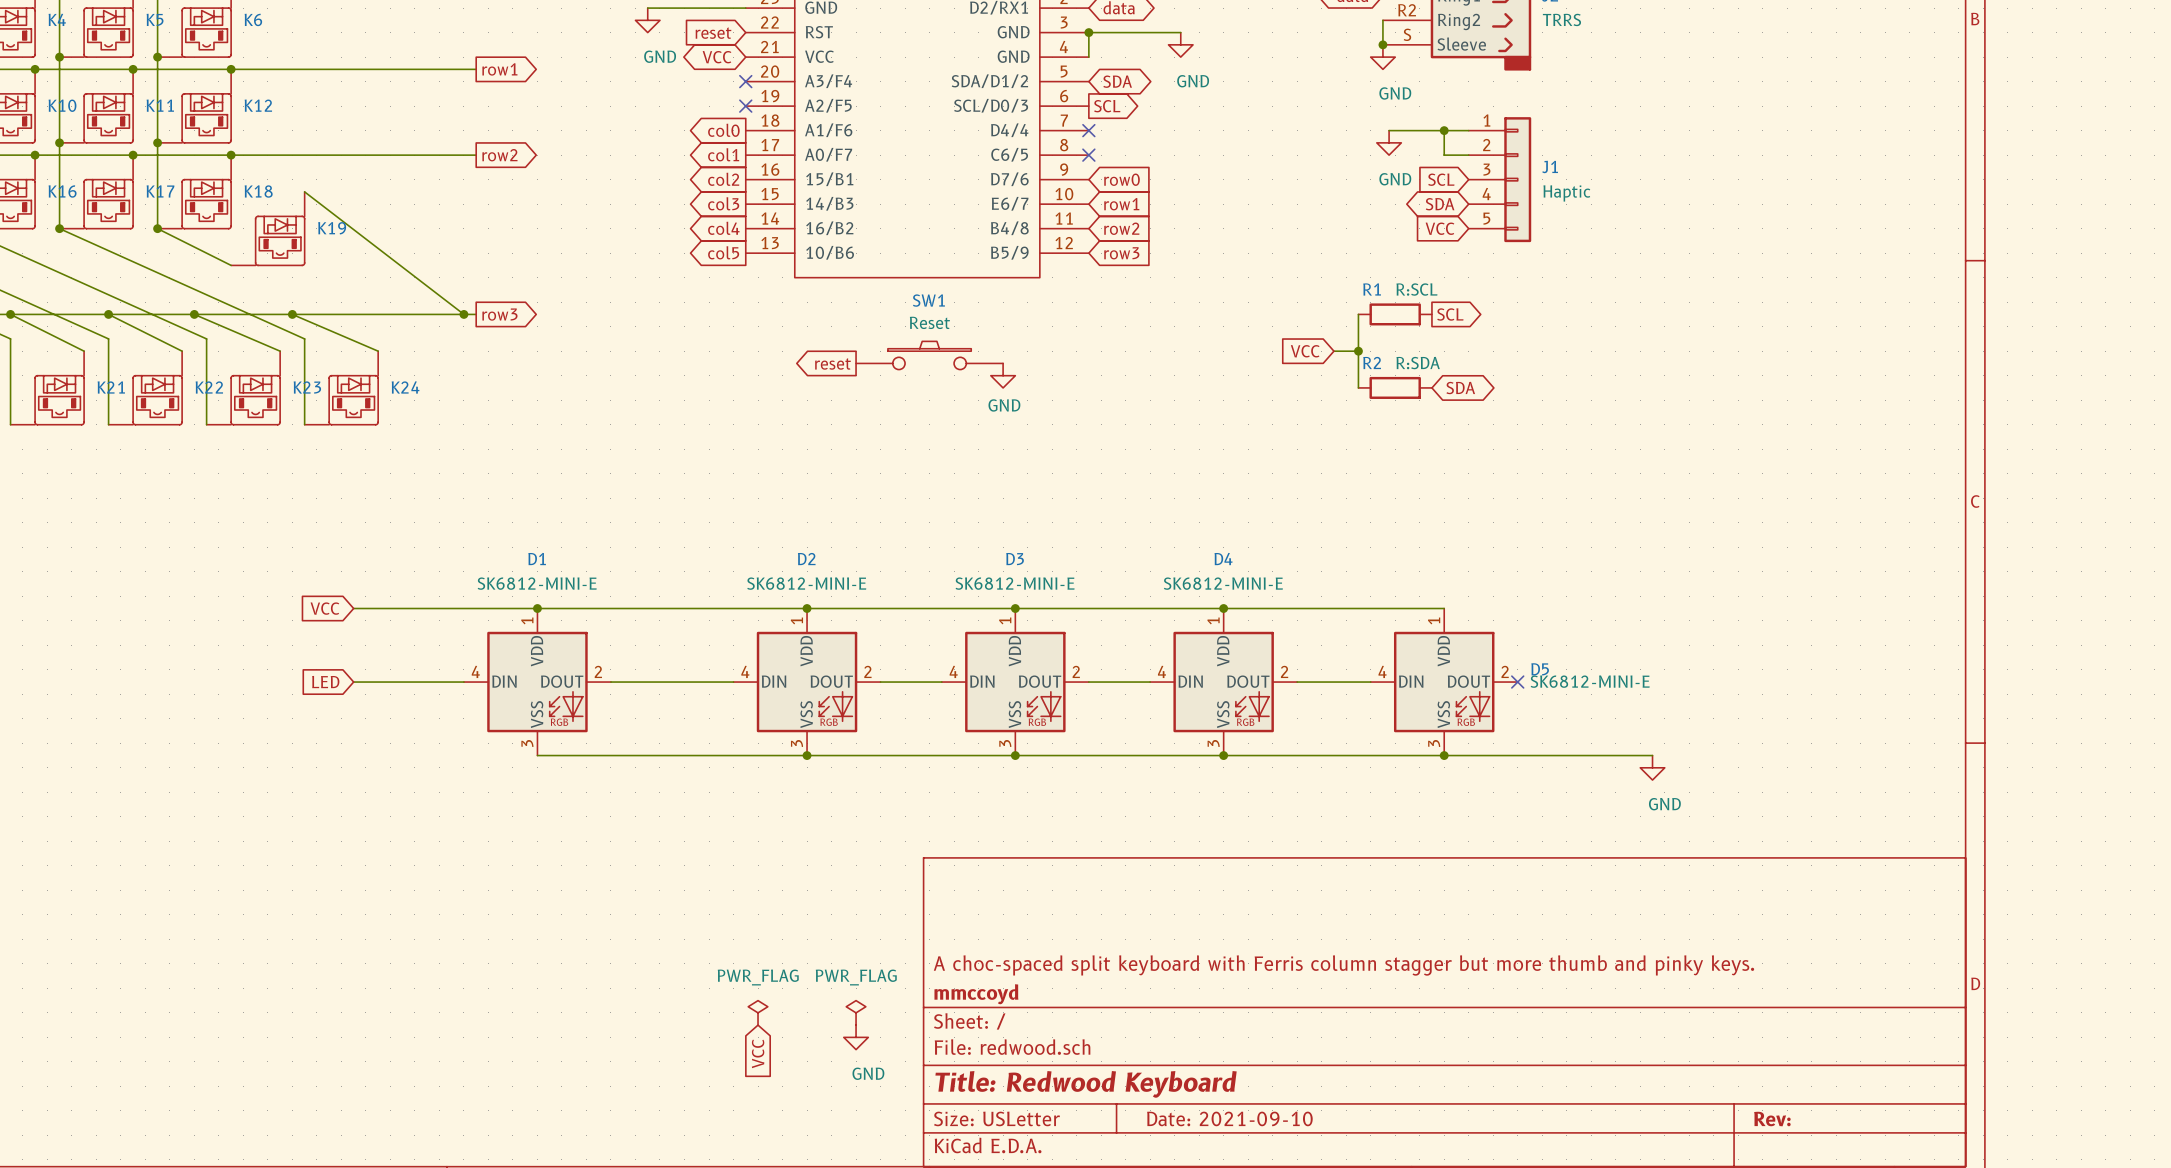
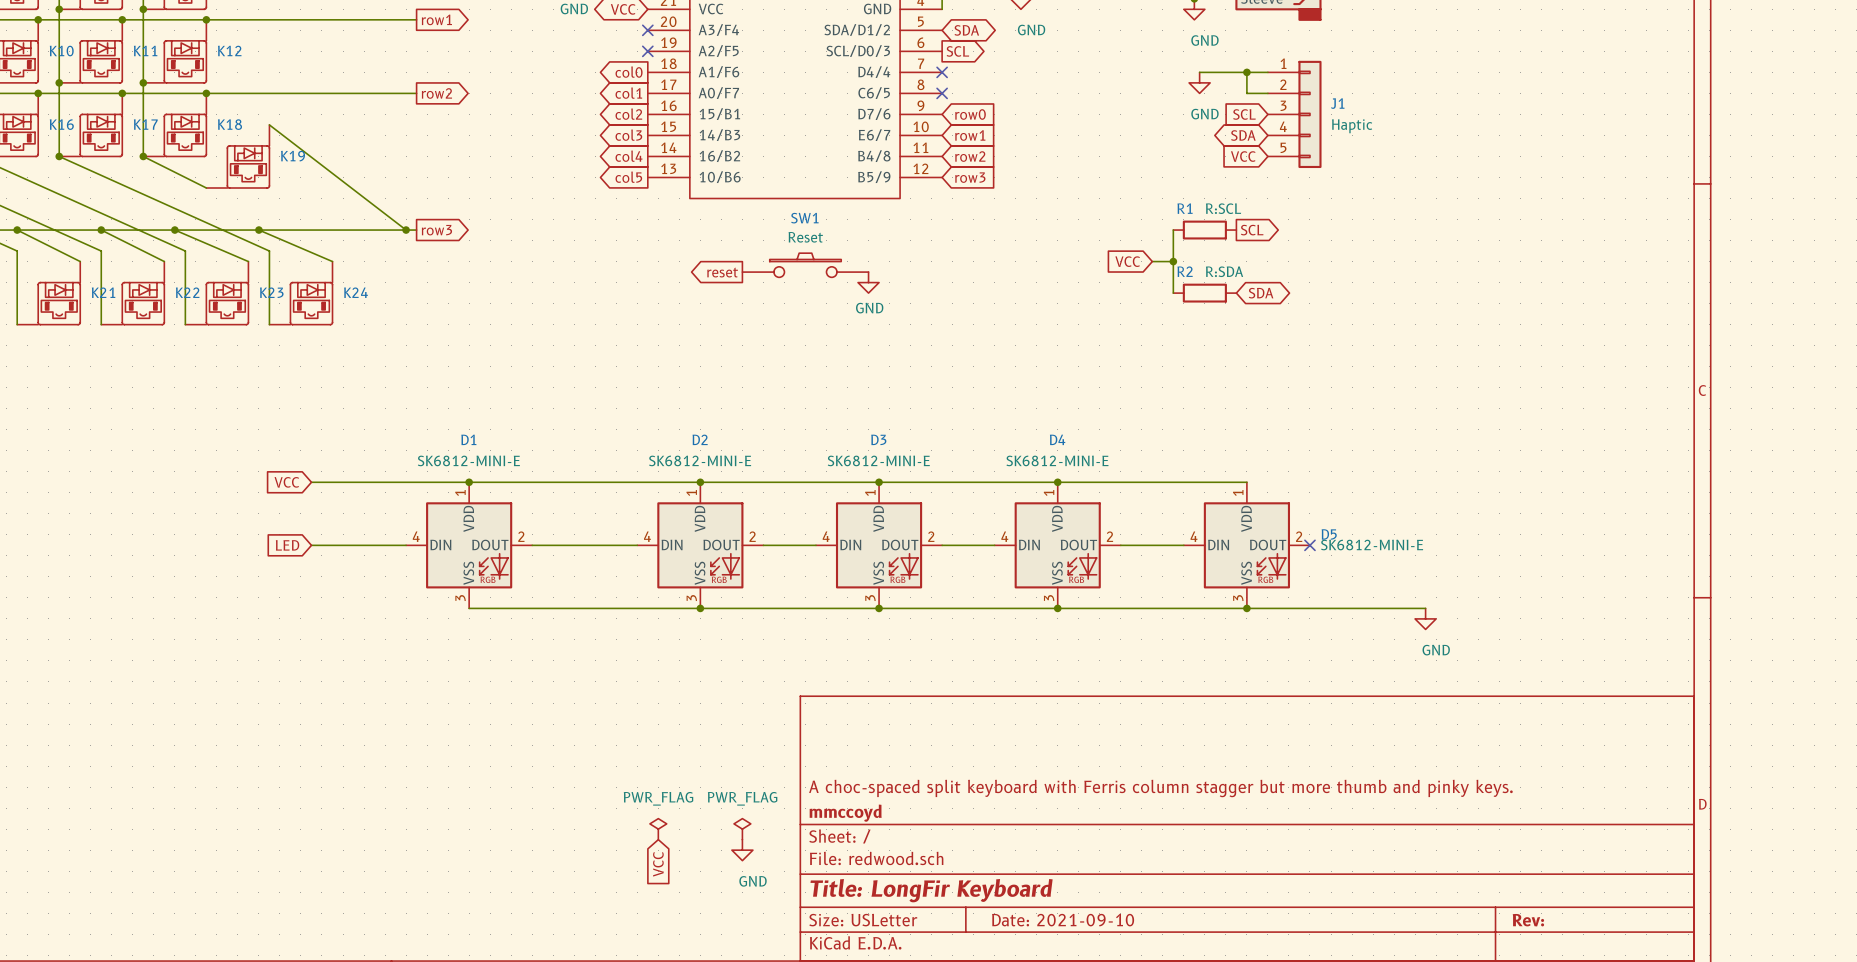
title block: Title: Redwood Keyboard (1086, 1084) -> Title: LongFir Keyboard (931, 890)

